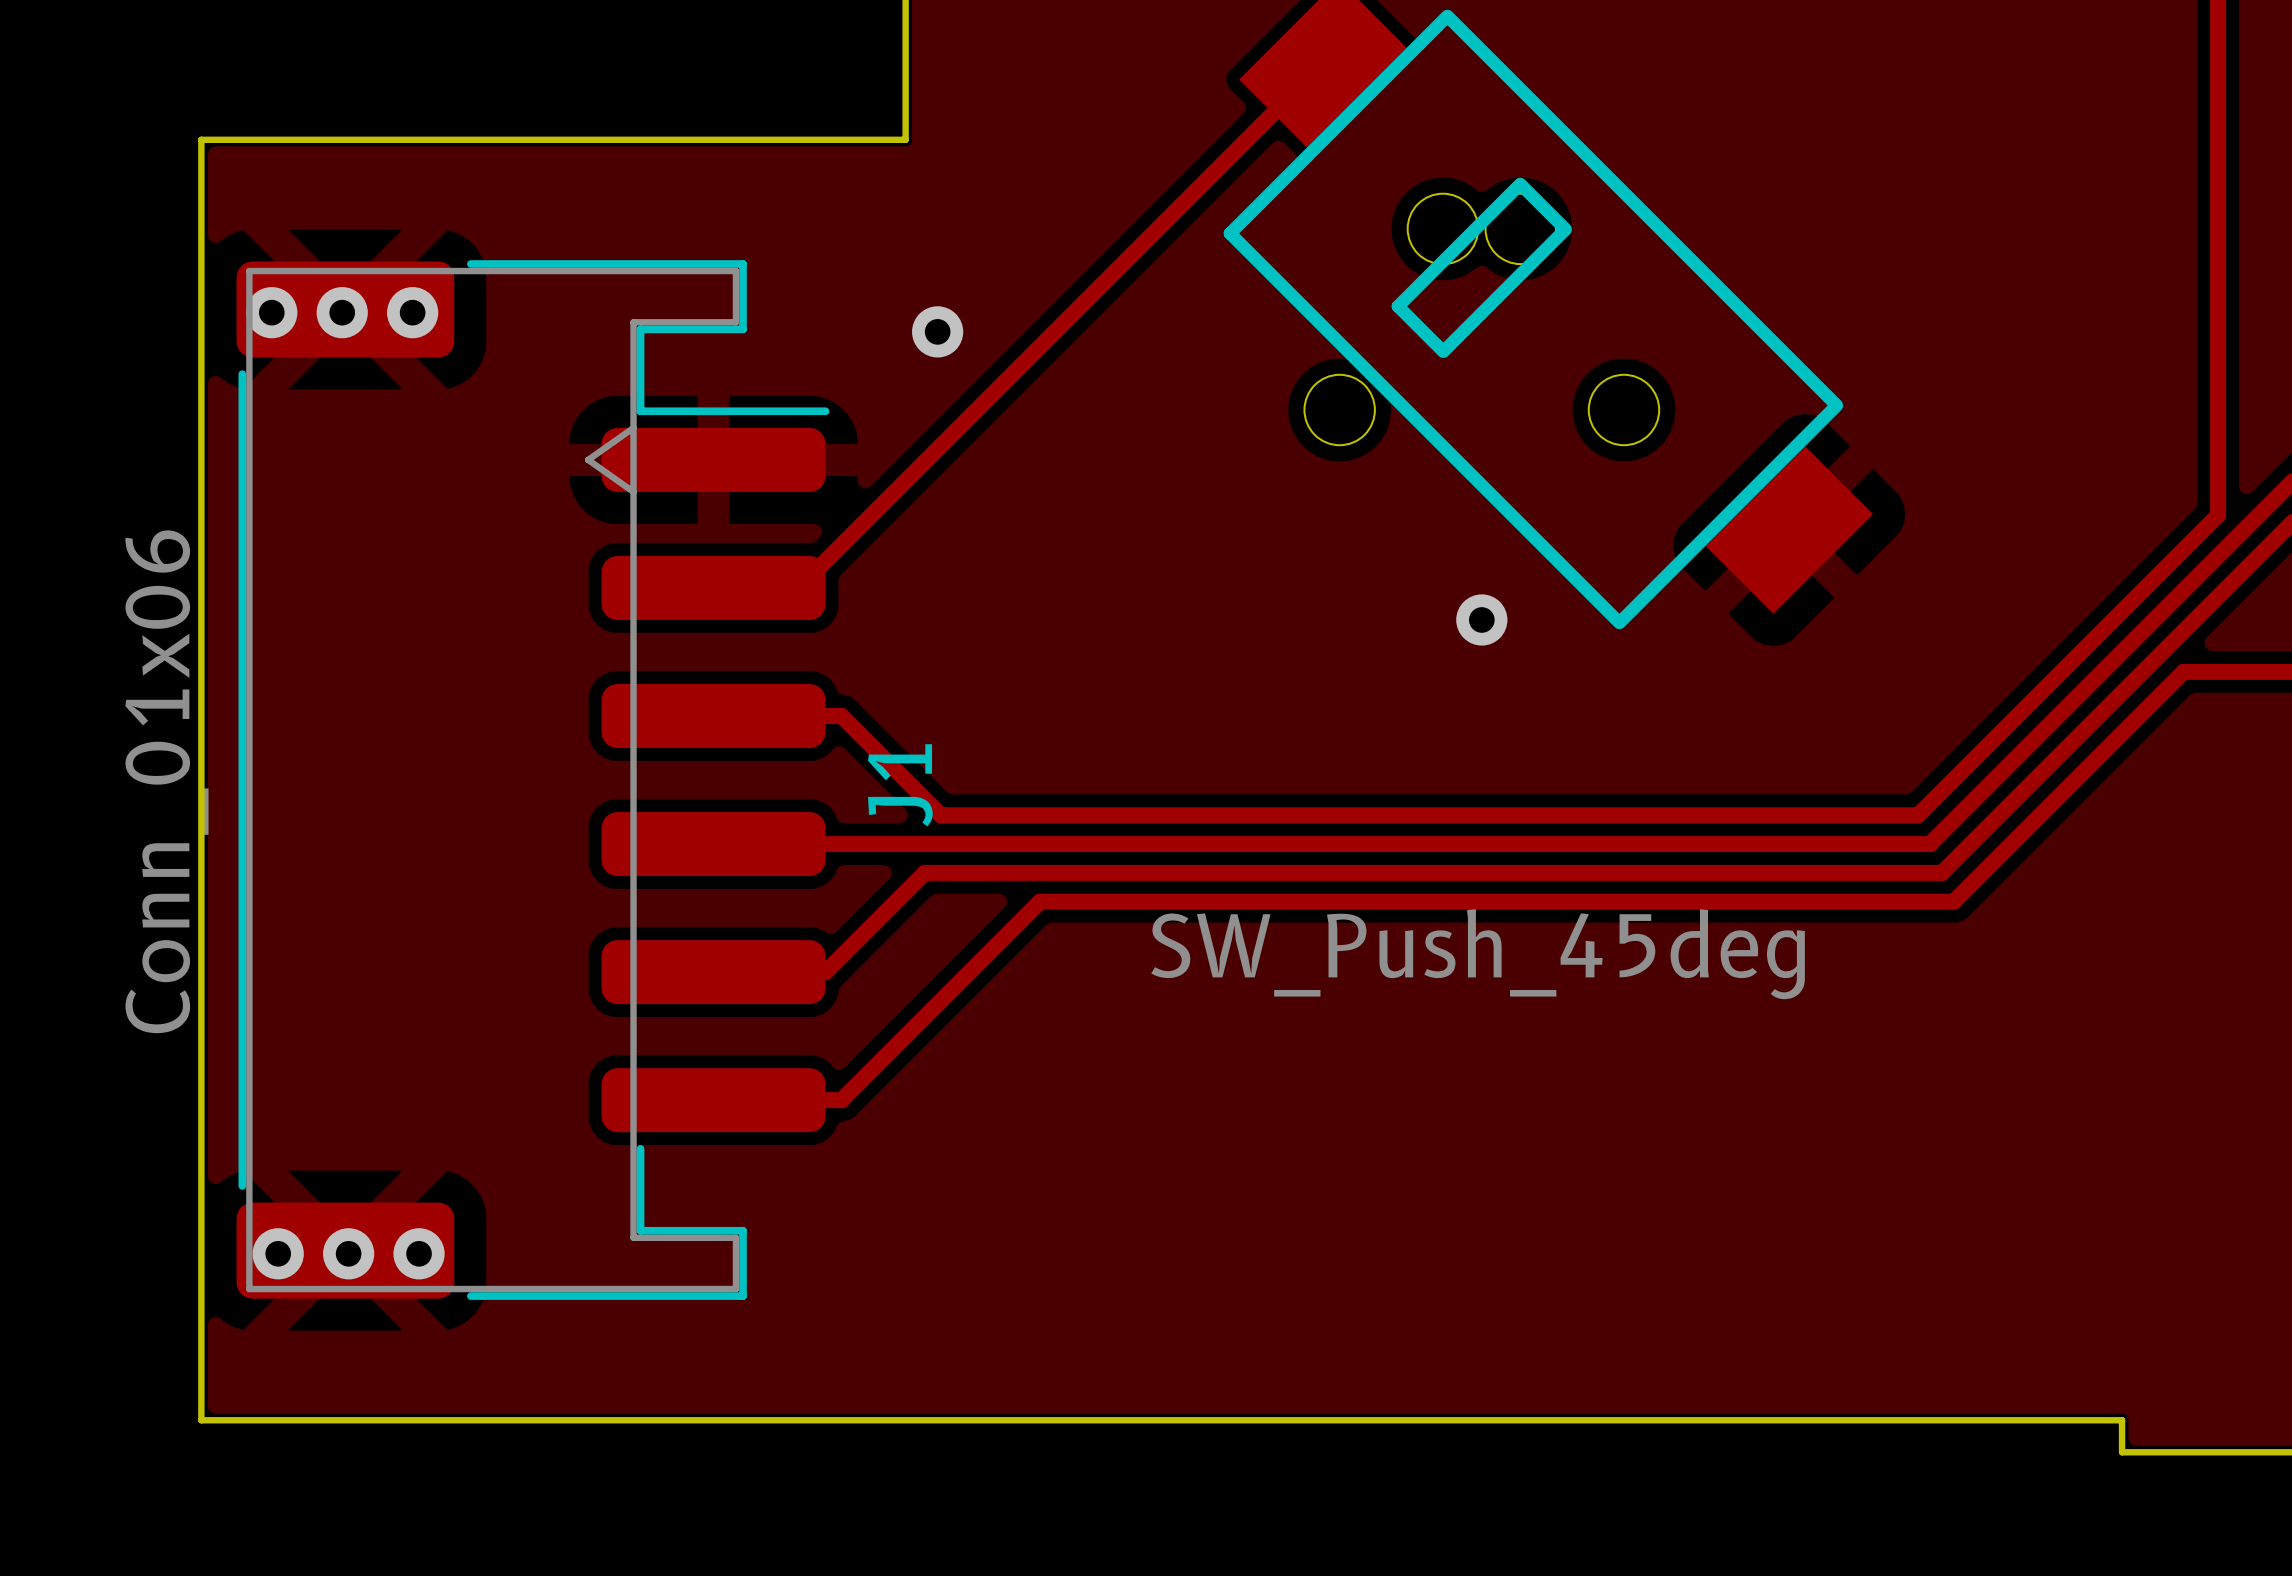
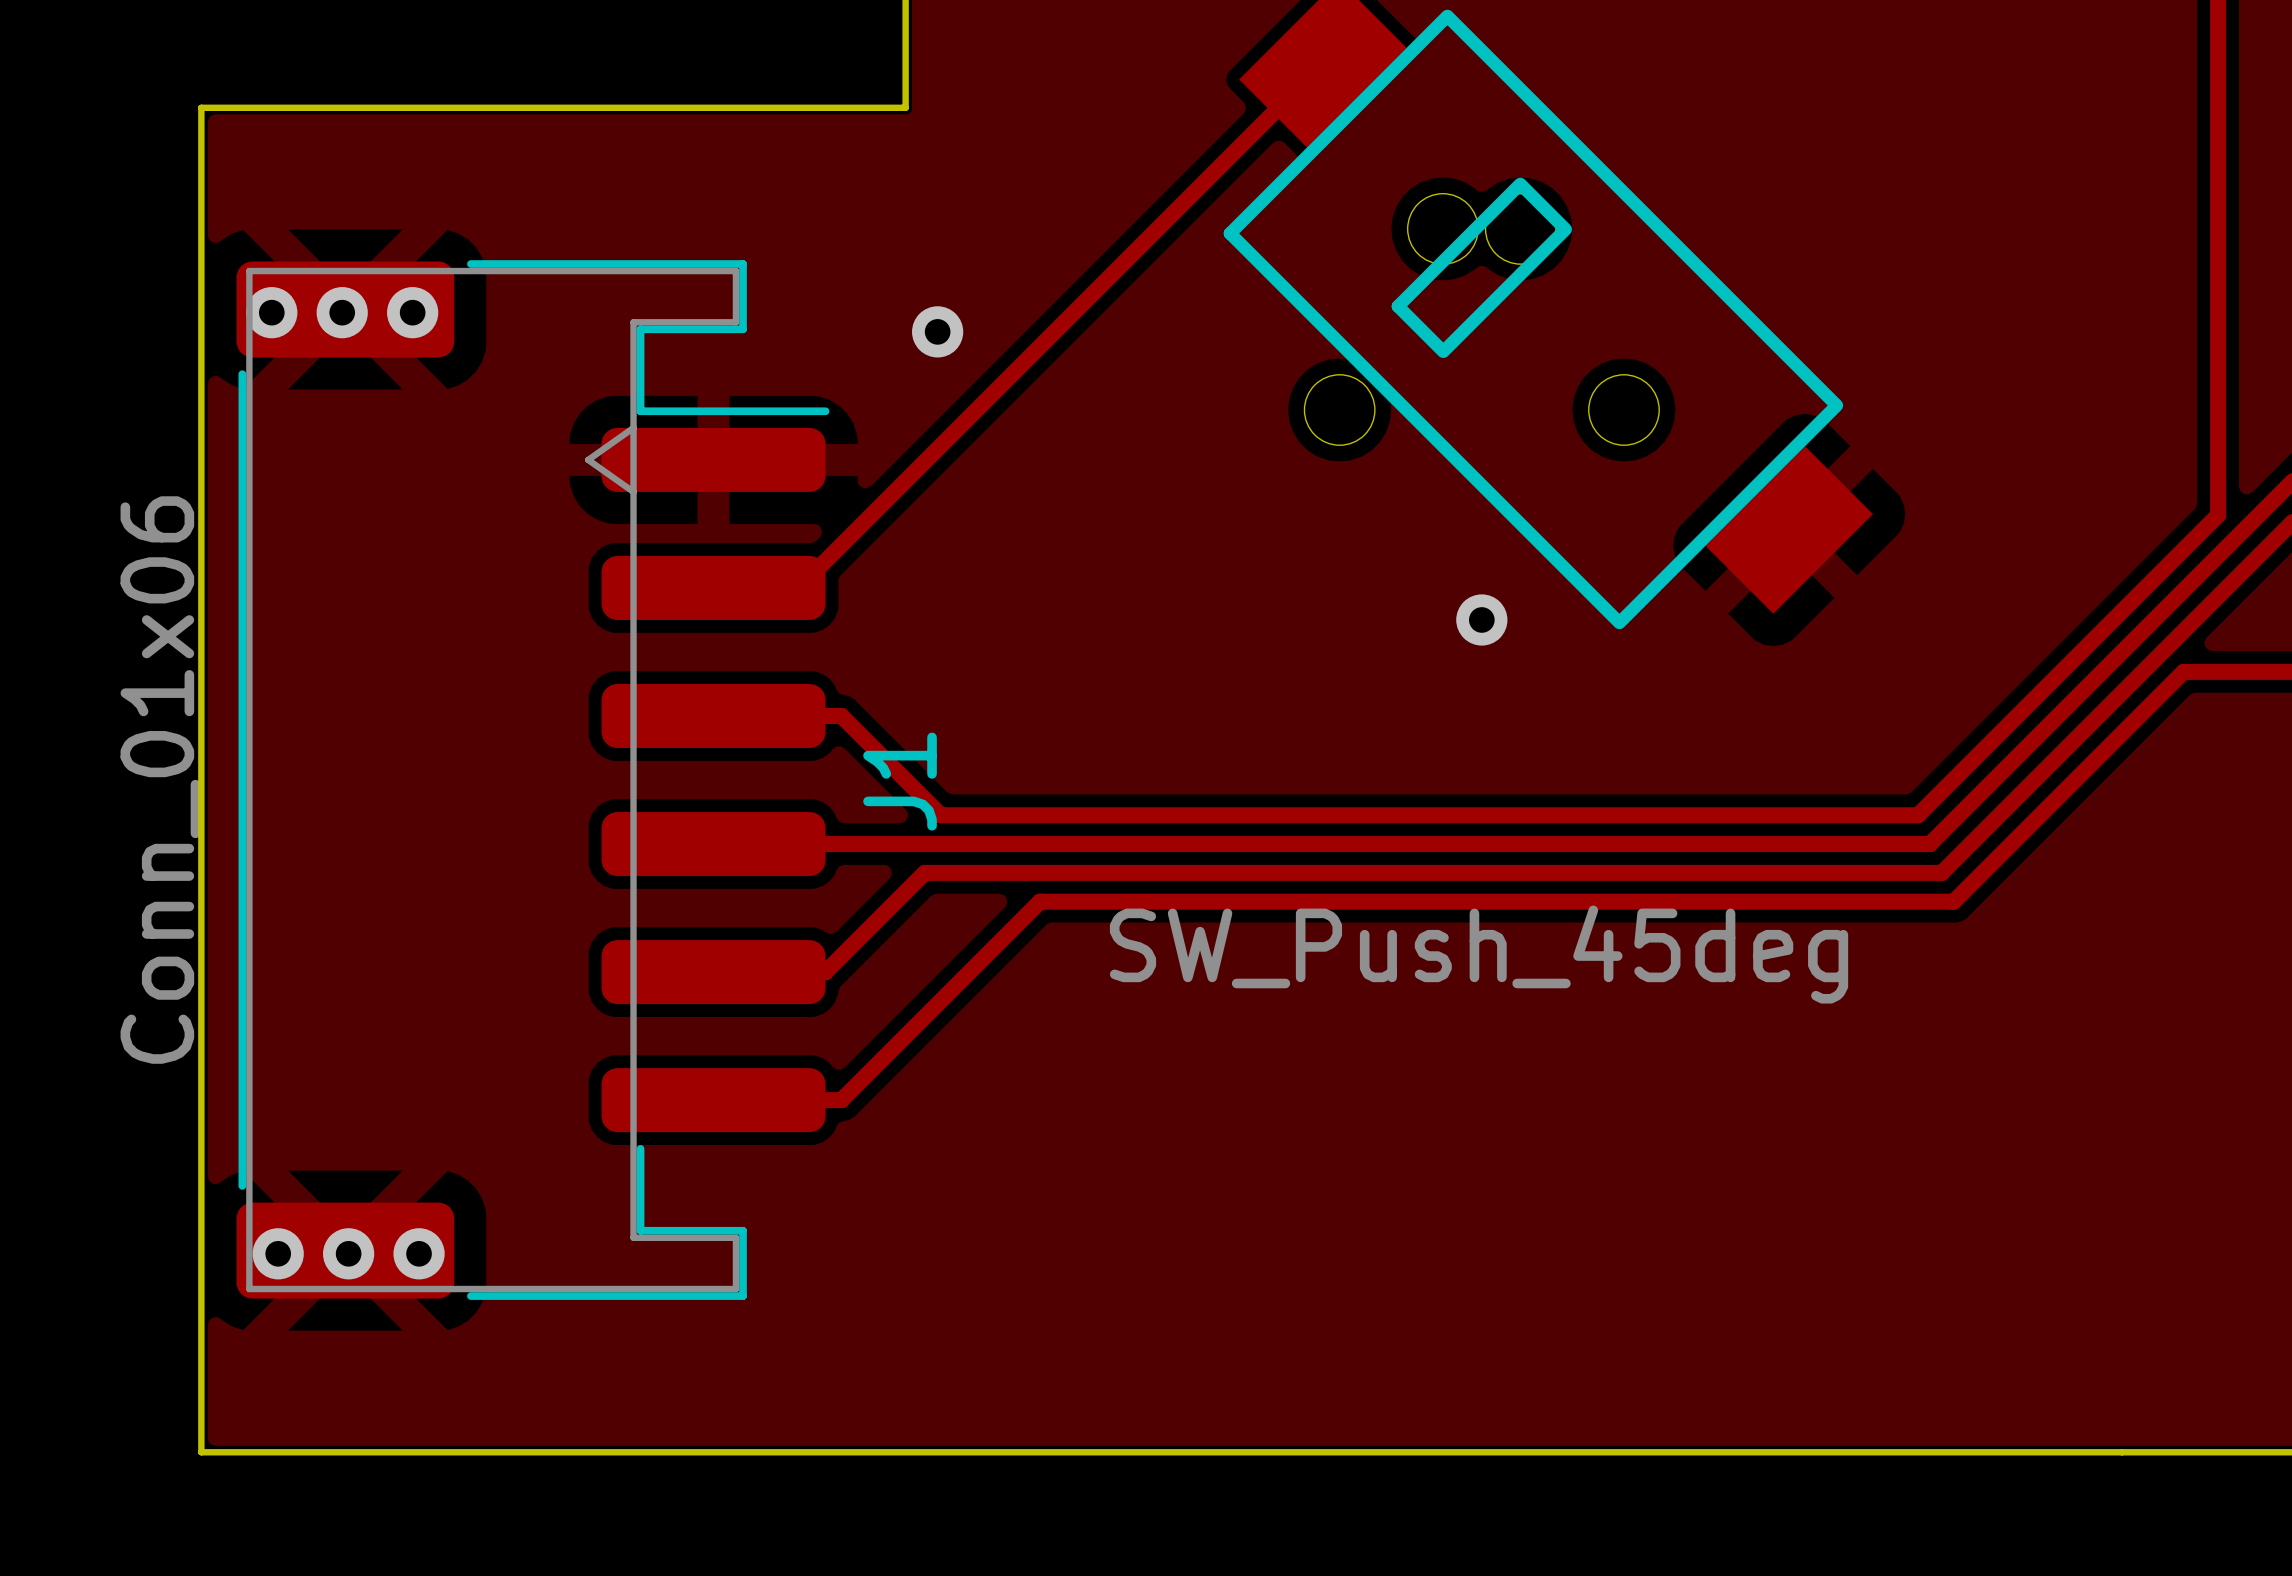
board edge: (905, 107) (905, 139) (201, 139) -> (905, 107) (201, 107) (201, 139)
board edge: (201, 1420) (2122, 1420) (2122, 1452) -> (201, 1420) (201, 1452) (2122, 1452)

